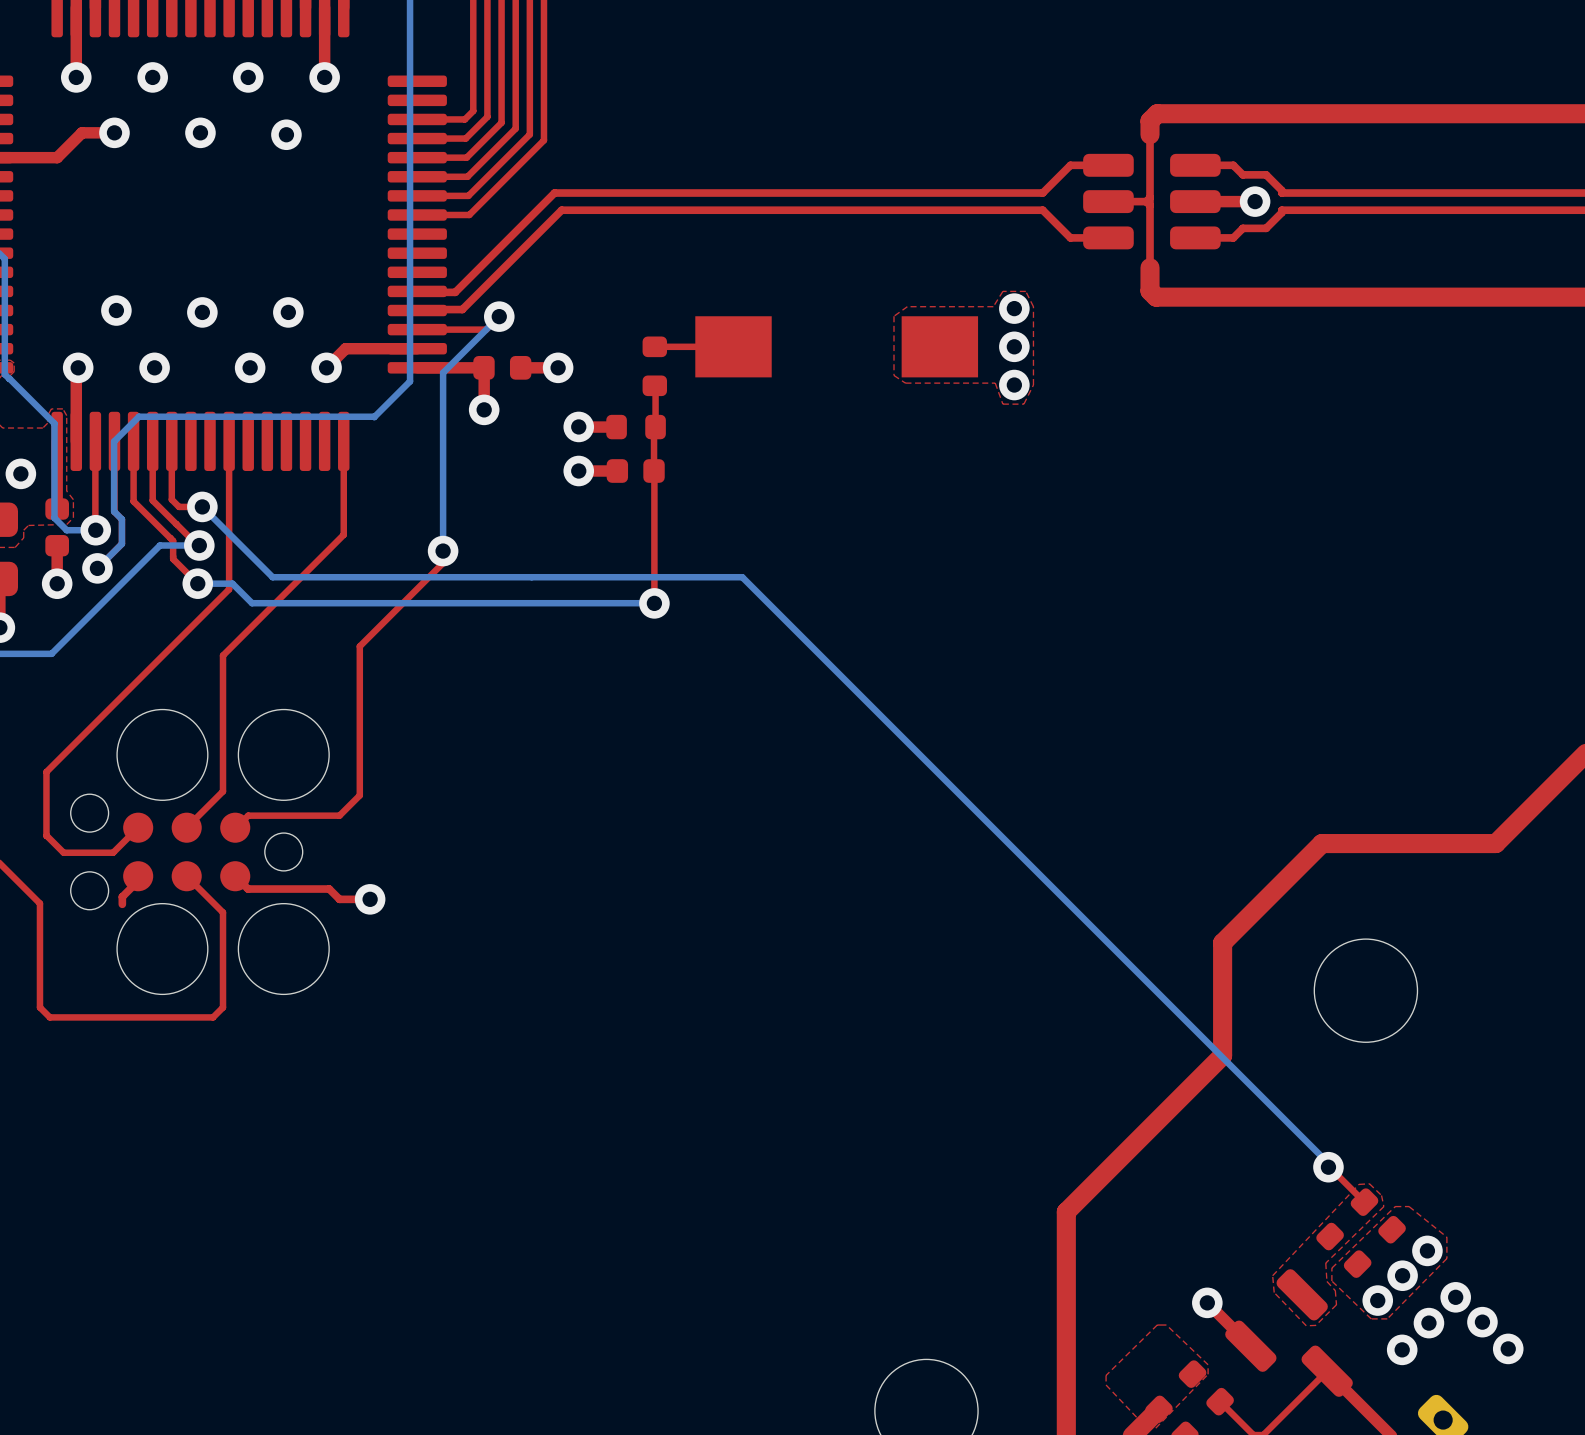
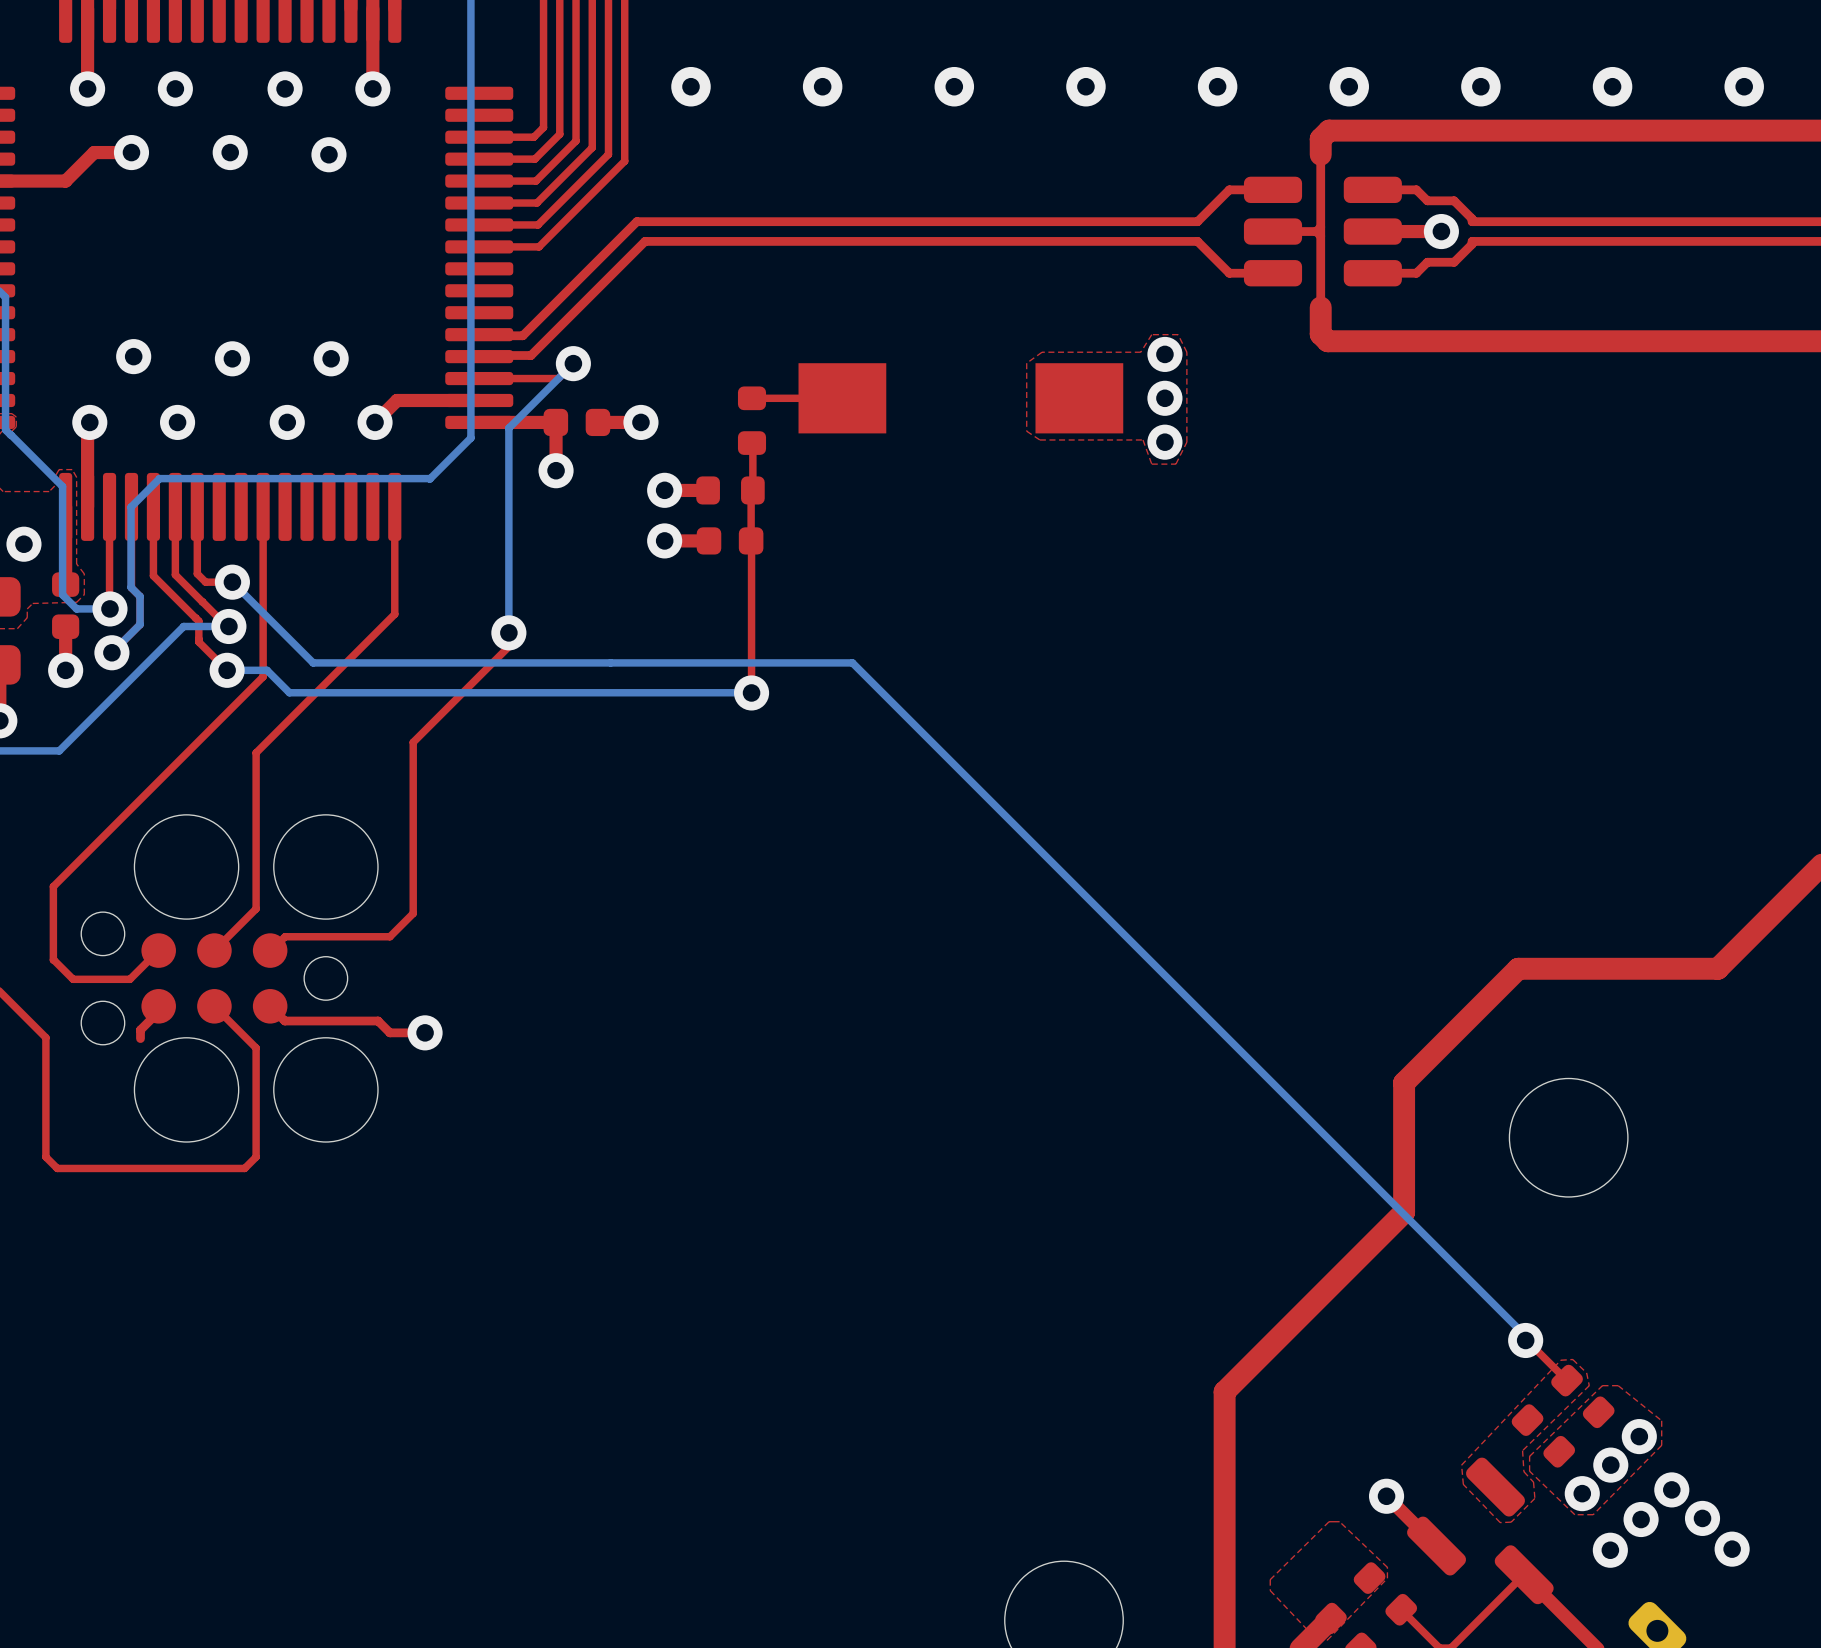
via: none -> (691, 86)
via: none -> (822, 86)
via: none -> (954, 86)
via: none -> (1085, 86)
via: none -> (1217, 86)
via: none -> (1349, 86)
via: none -> (1480, 86)
via: none -> (1612, 86)
via: none -> (1744, 86)

